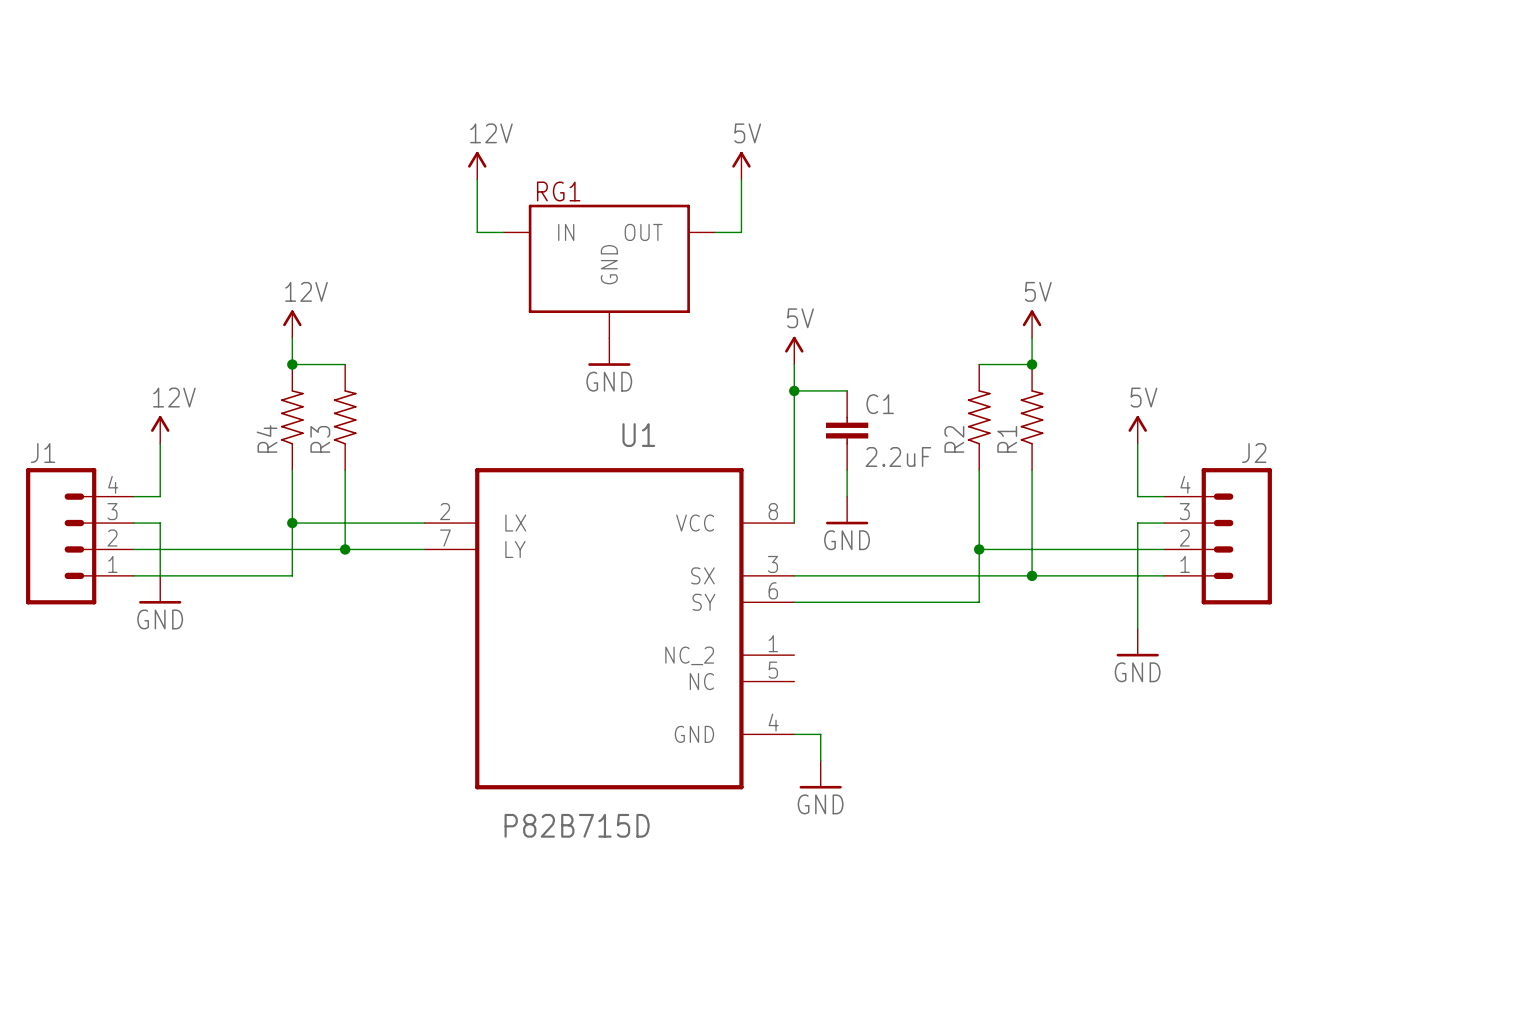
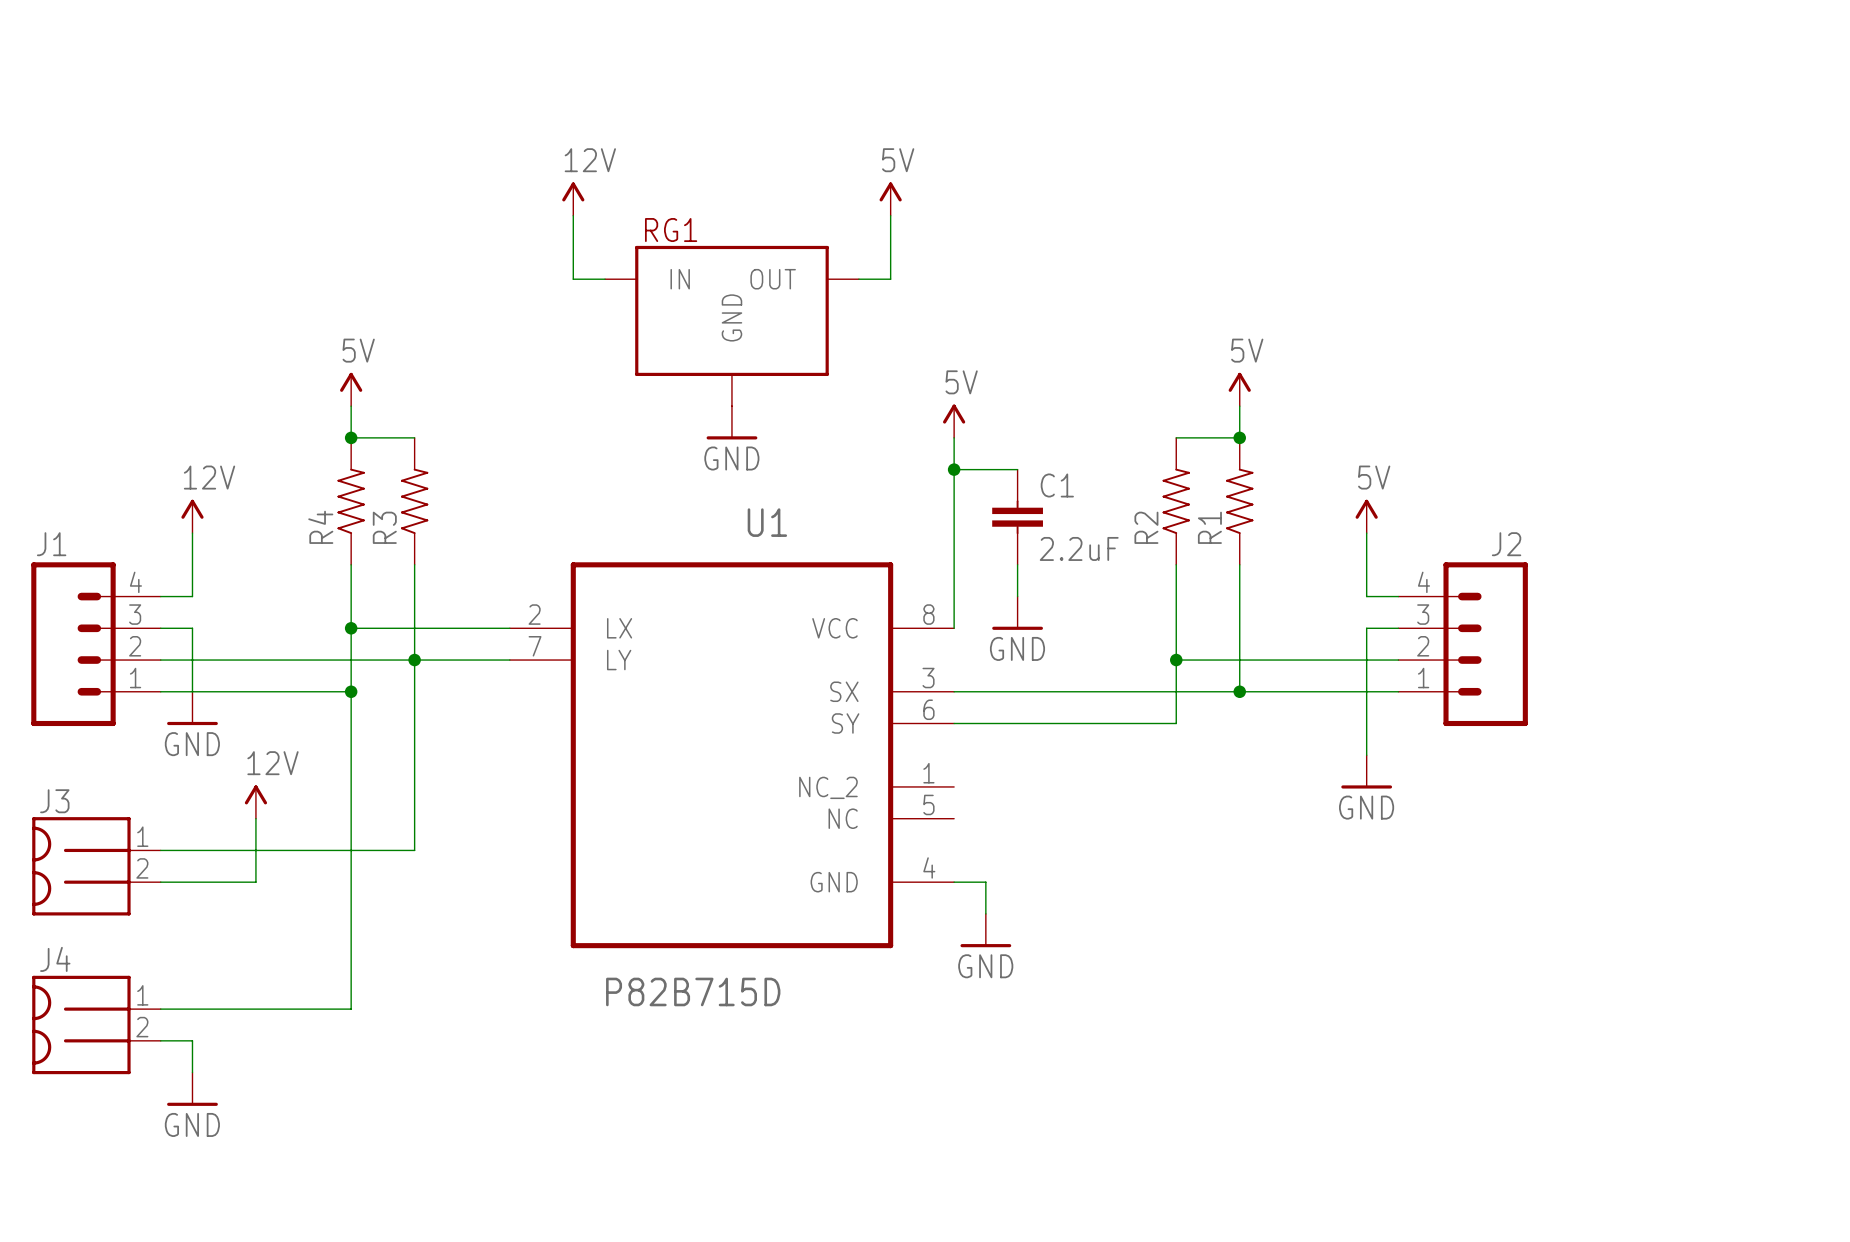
power symbol: 12V (292, 324) -> 5V (351, 389)
wire: none -> (414, 660) (414, 850) (160, 850)
wire: none -> (351, 691) (351, 1009) (160, 1009)
junction: none -> (351, 691)
power symbol: none -> 12V (255, 802)
wire: none -> (255, 818) (255, 882) (160, 882)
J3: none -> (96, 866)
J4: none -> (96, 1024)
wire: none -> (160, 1040) (192, 1040) (192, 1072)
power symbol: none -> GND (192, 1089)

